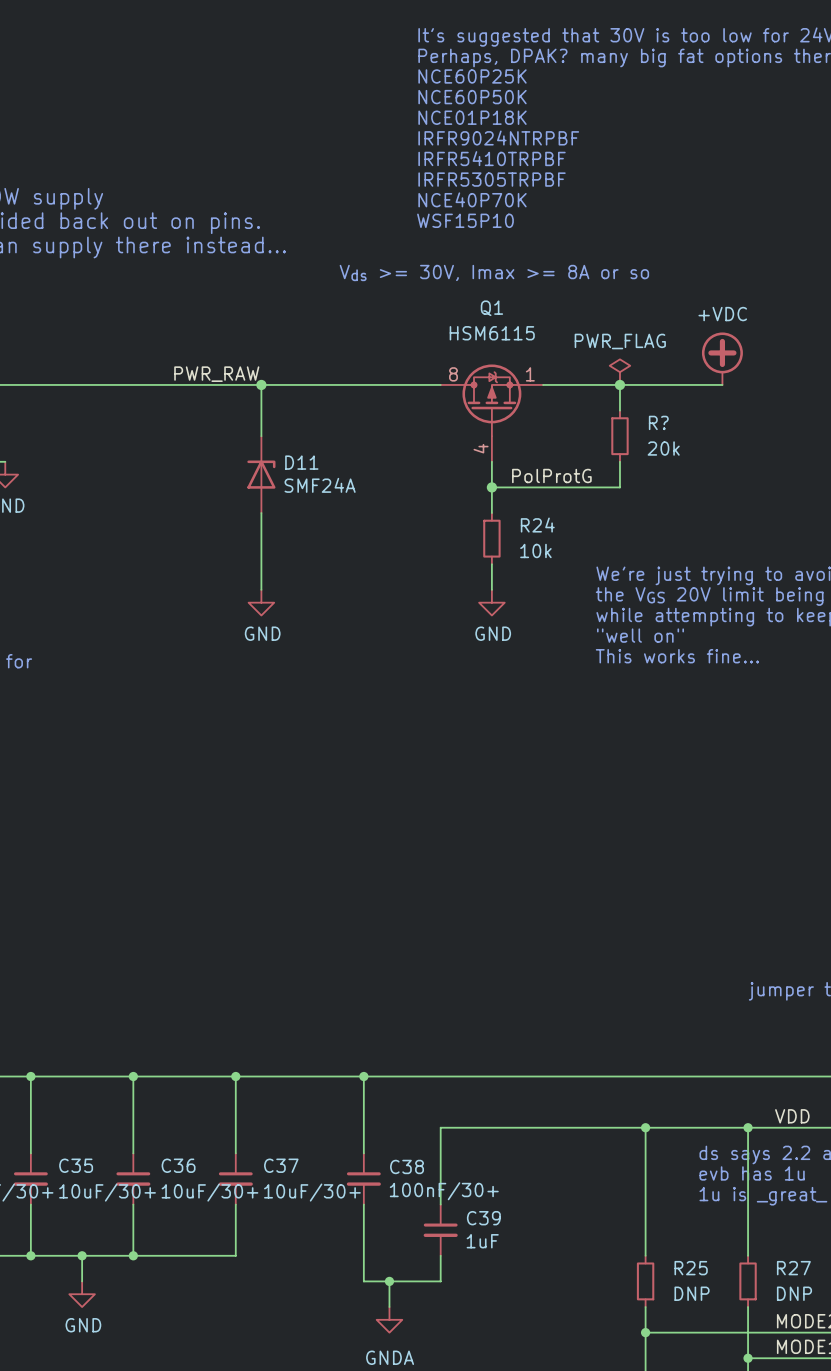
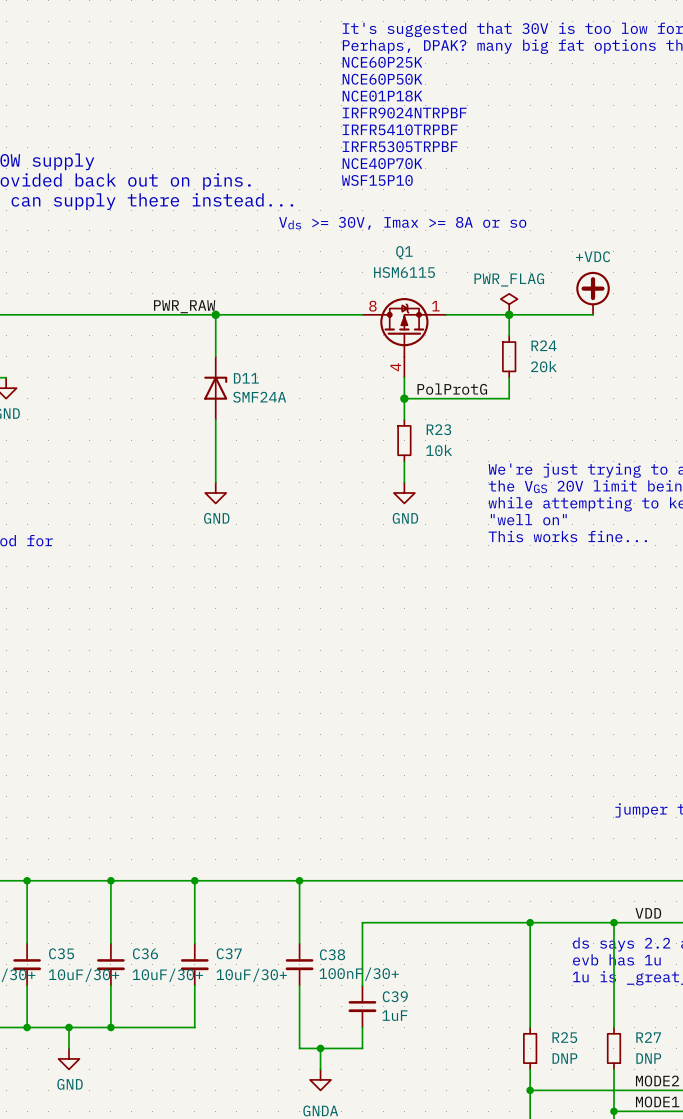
R? name: R? (658, 422) -> R24 (544, 345)
R24 name: R24 (537, 525) -> R23 (438, 429)

